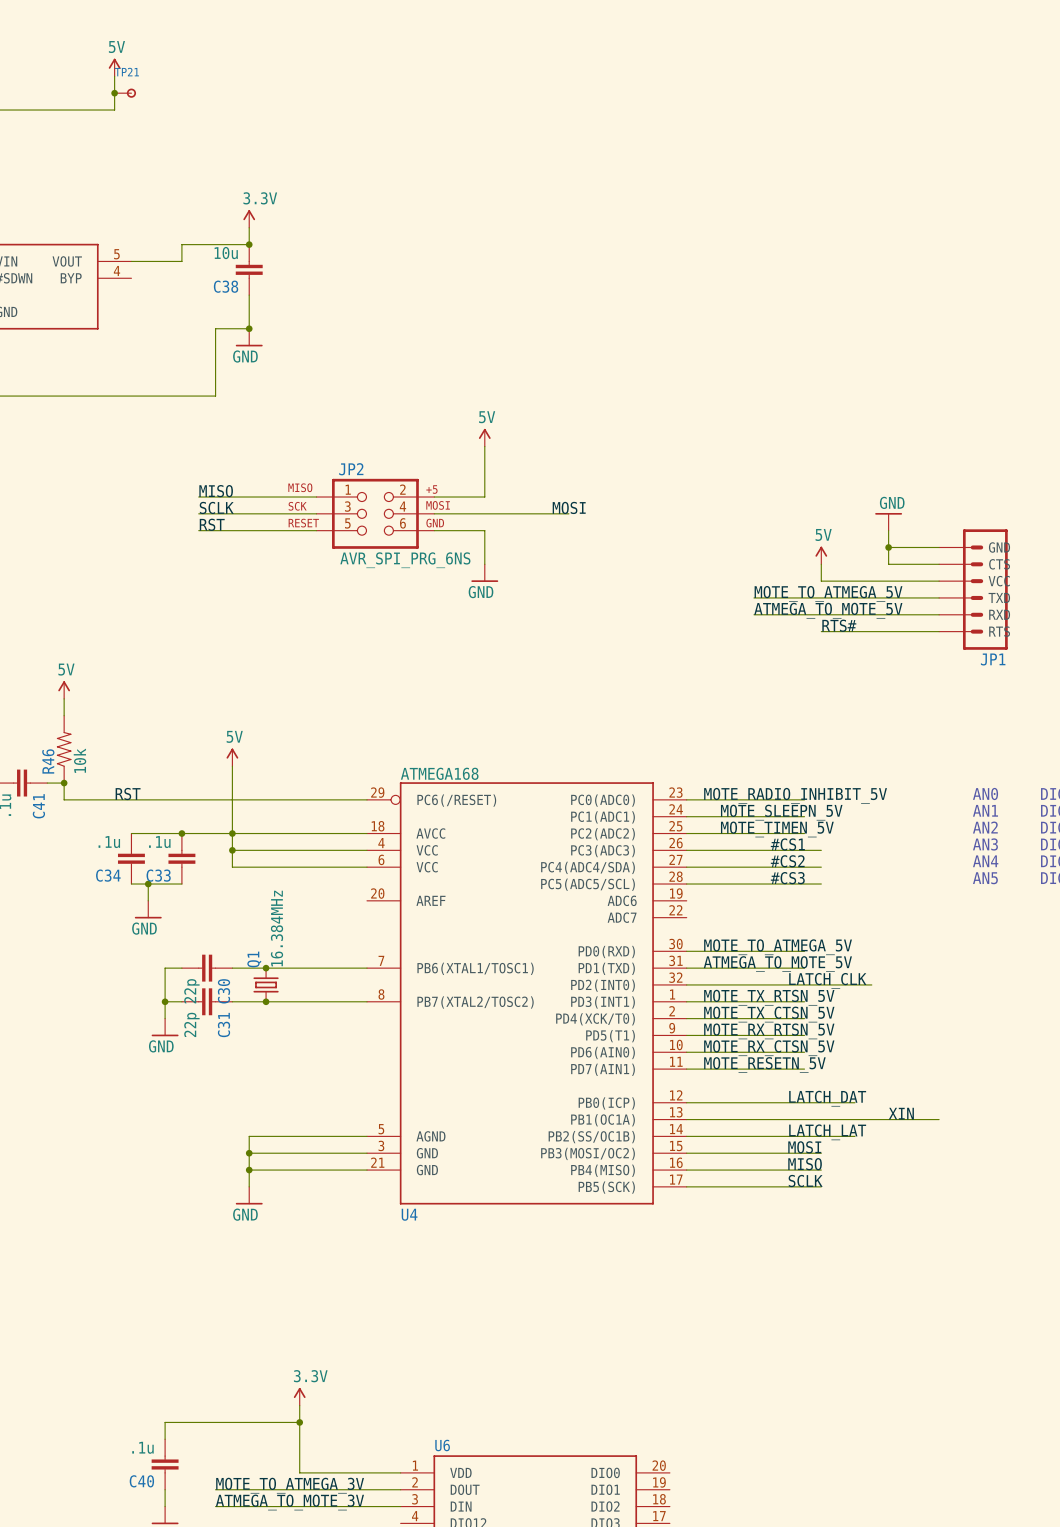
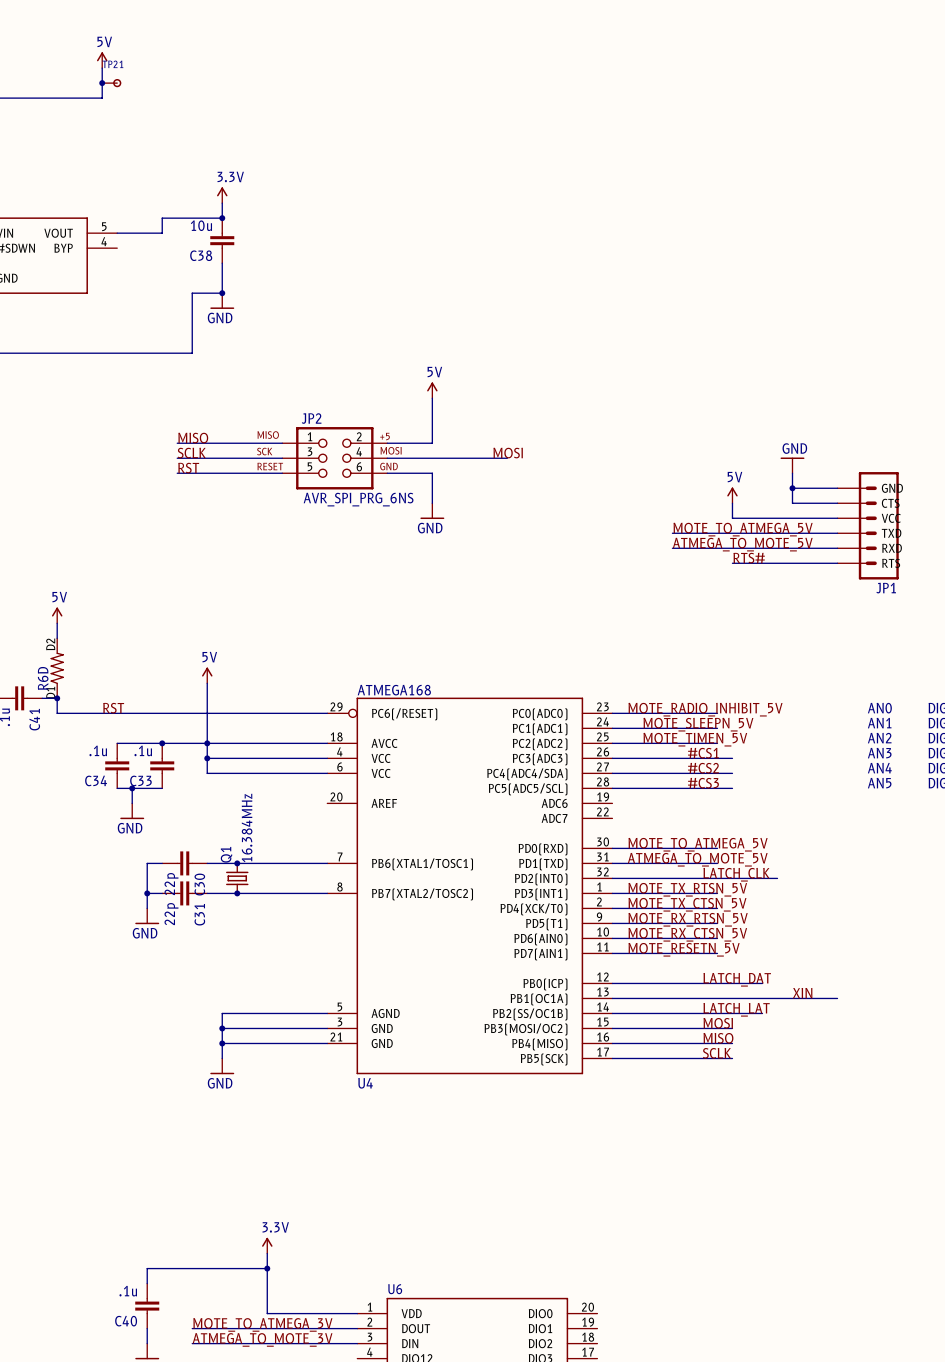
R46 pin number: none -> D2 (50, 644)
R46 value: 10k (79, 760) -> none
R46 name: R46 (48, 761) -> R6D (43, 678)
R46 pin number: none -> D1 (50, 692)

